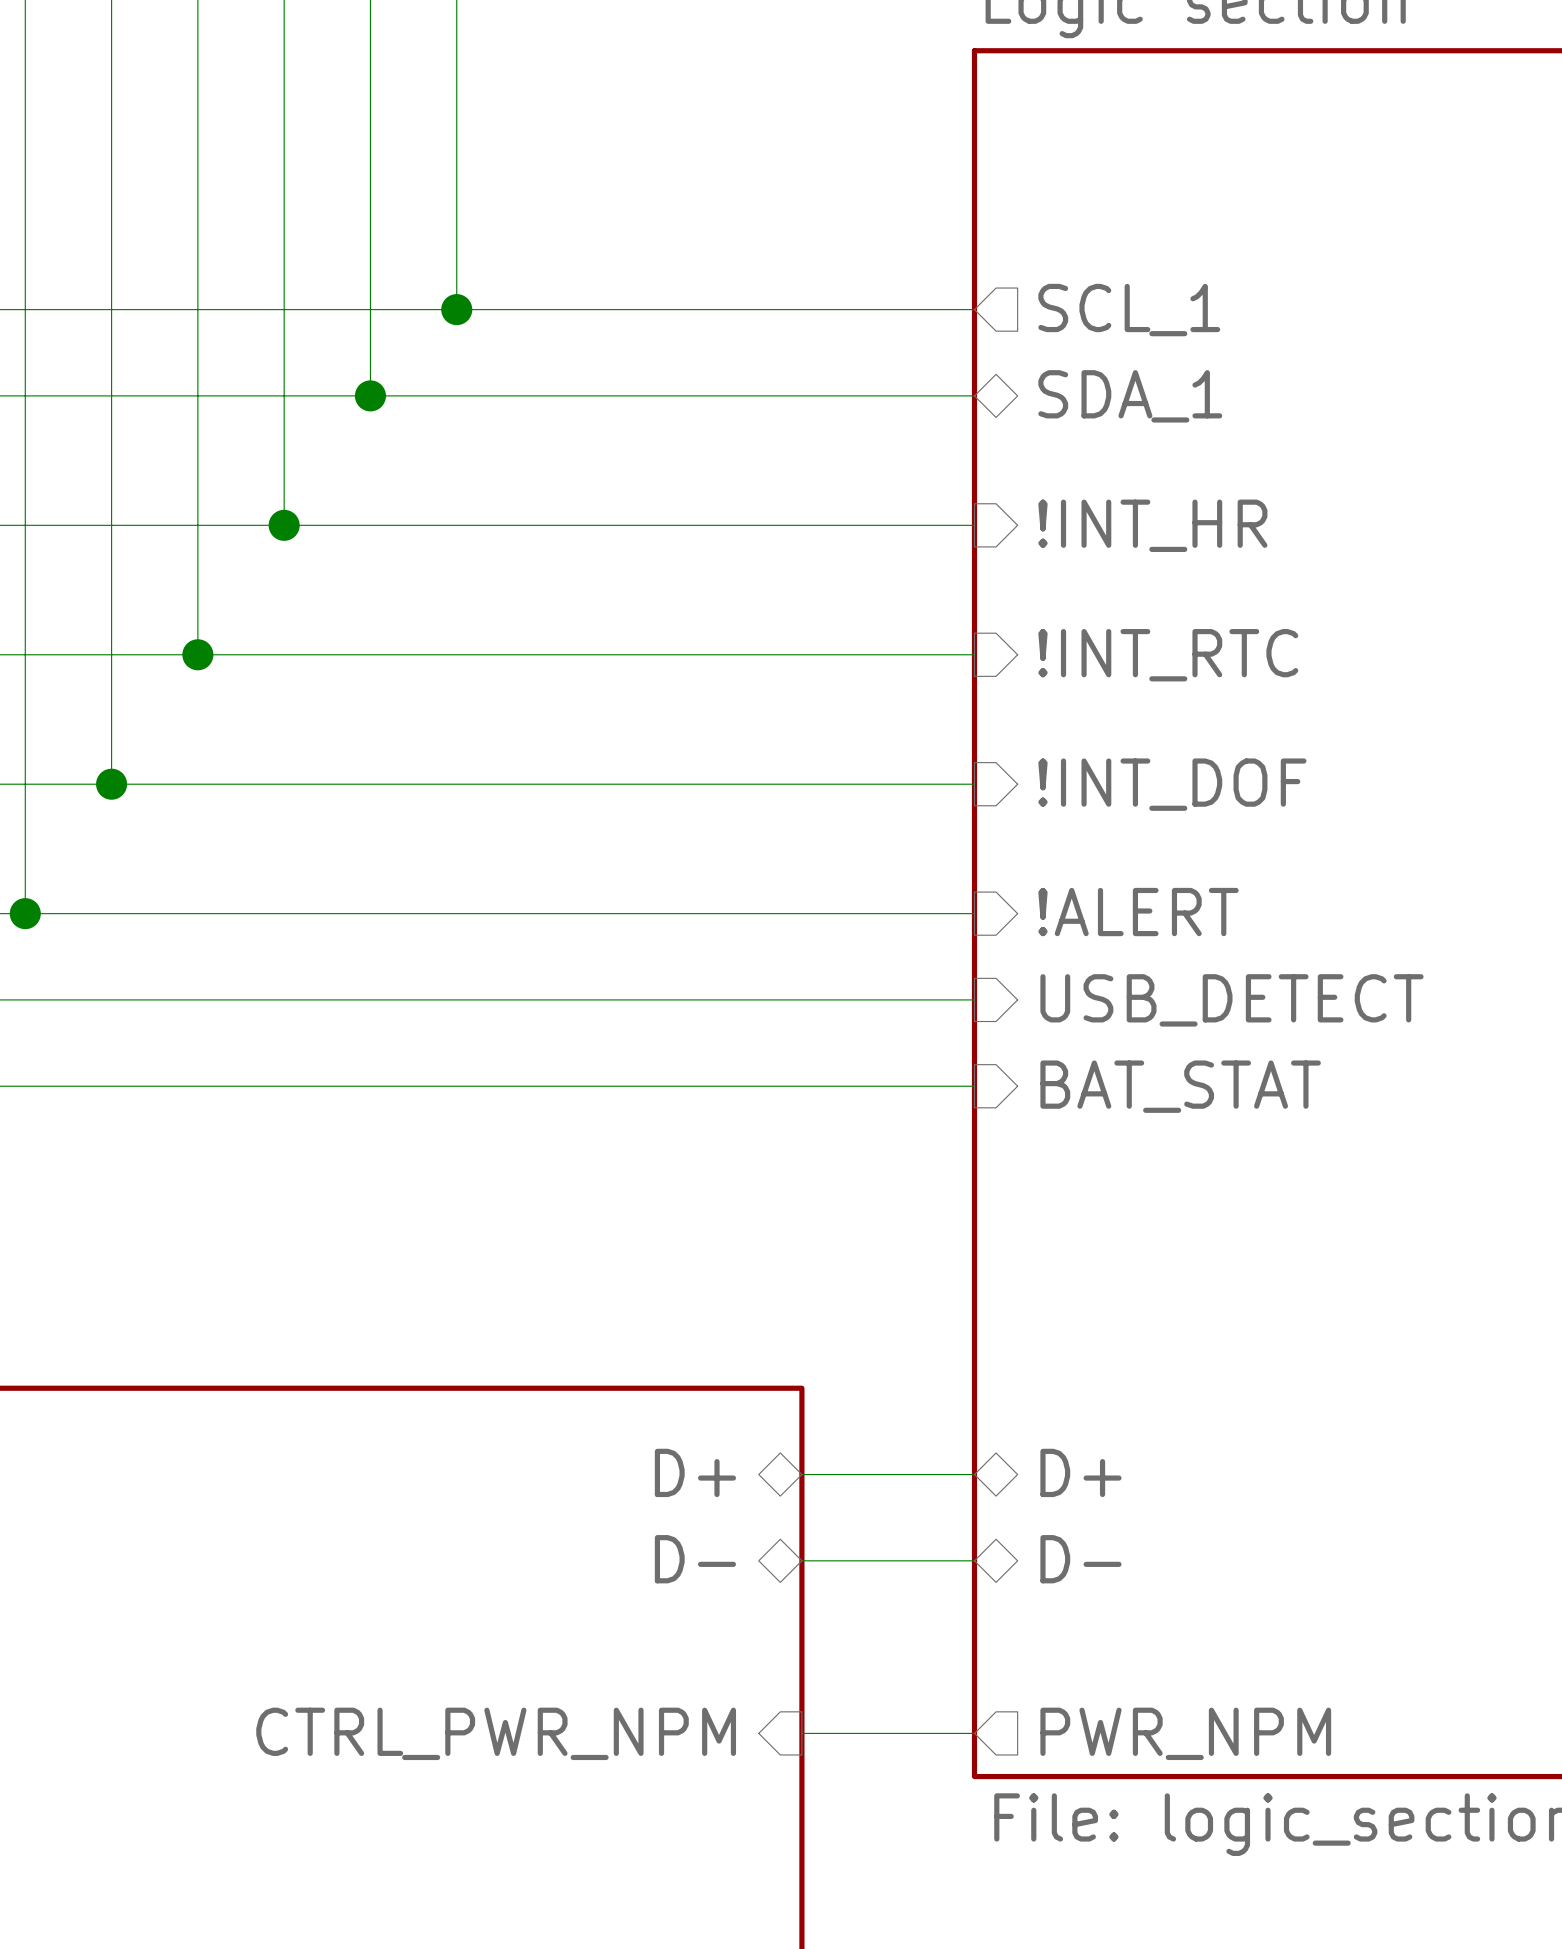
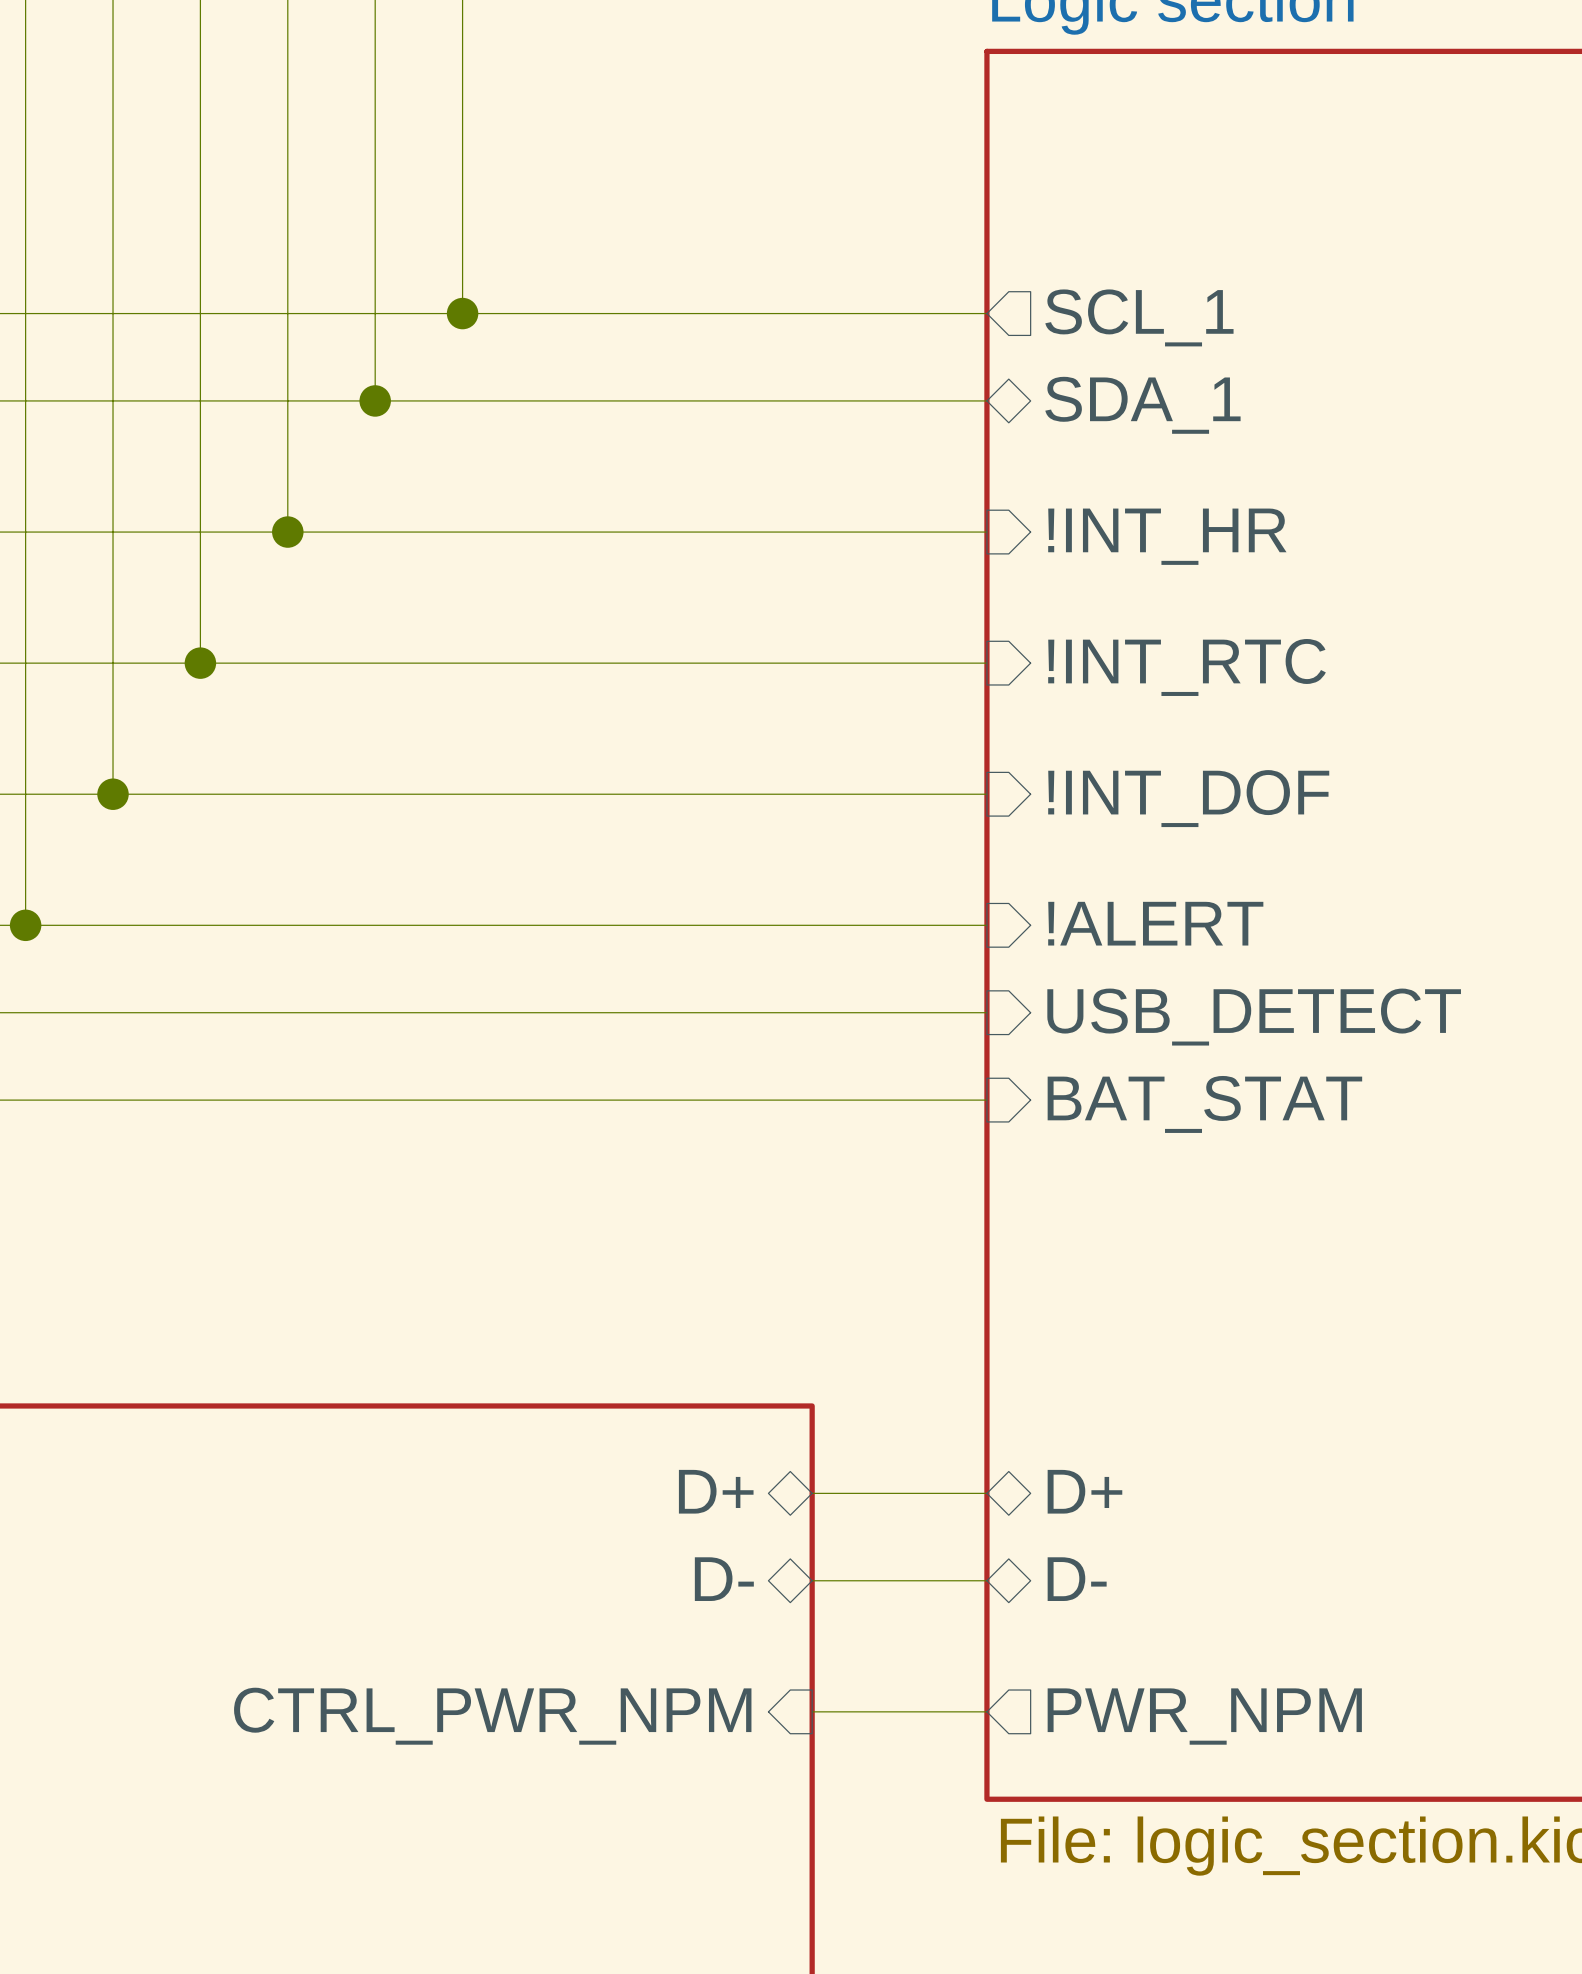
sheet pin position: CTRL_PWR_NPM (496, 1733) -> CTRL_PWR_NPM (492, 1716)
wire: (801, 1733) (974, 1733) -> (812, 1711) (986, 1711)
sheet pin position: PWR_NPM (1185, 1733) -> PWR_NPM (1204, 1716)

